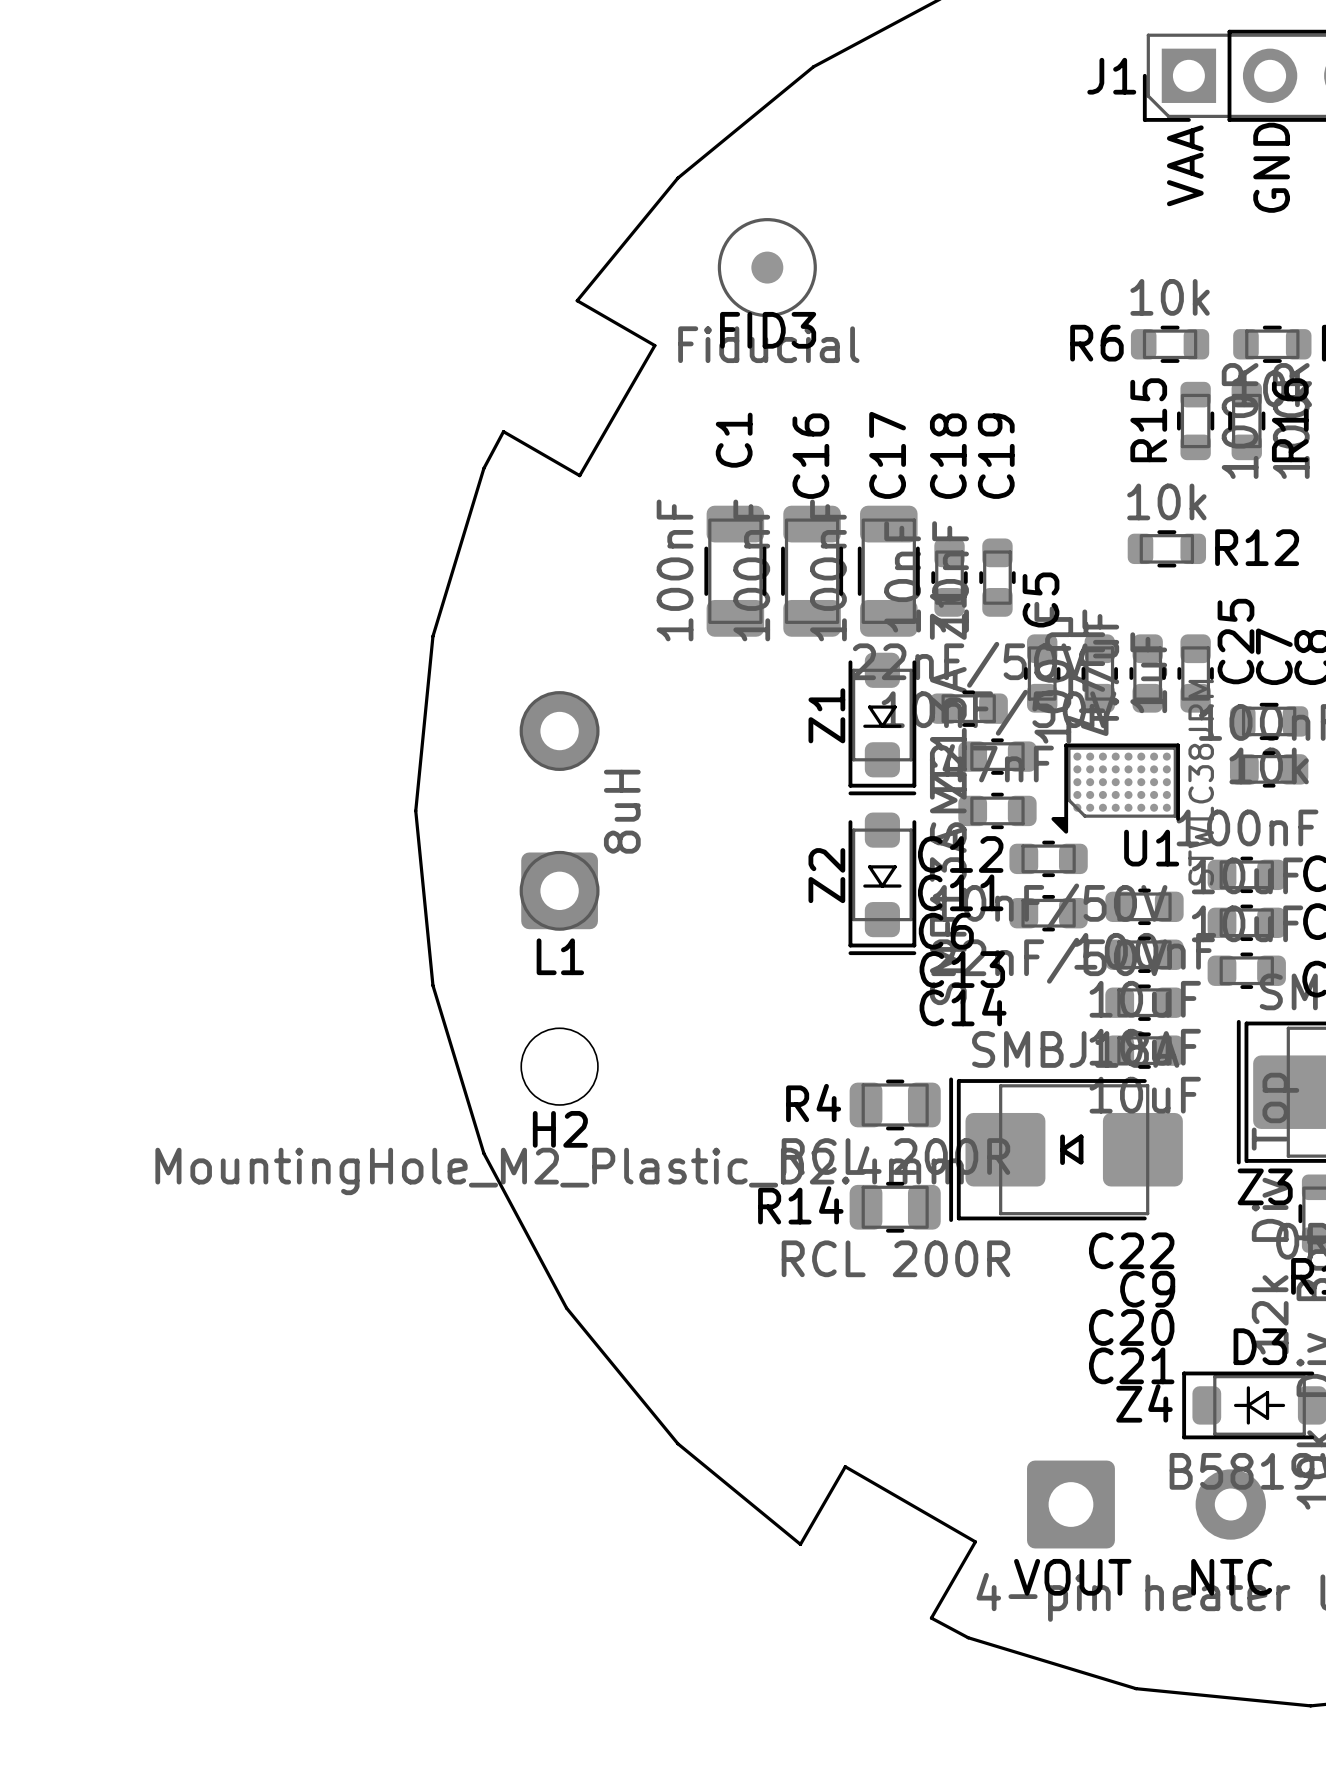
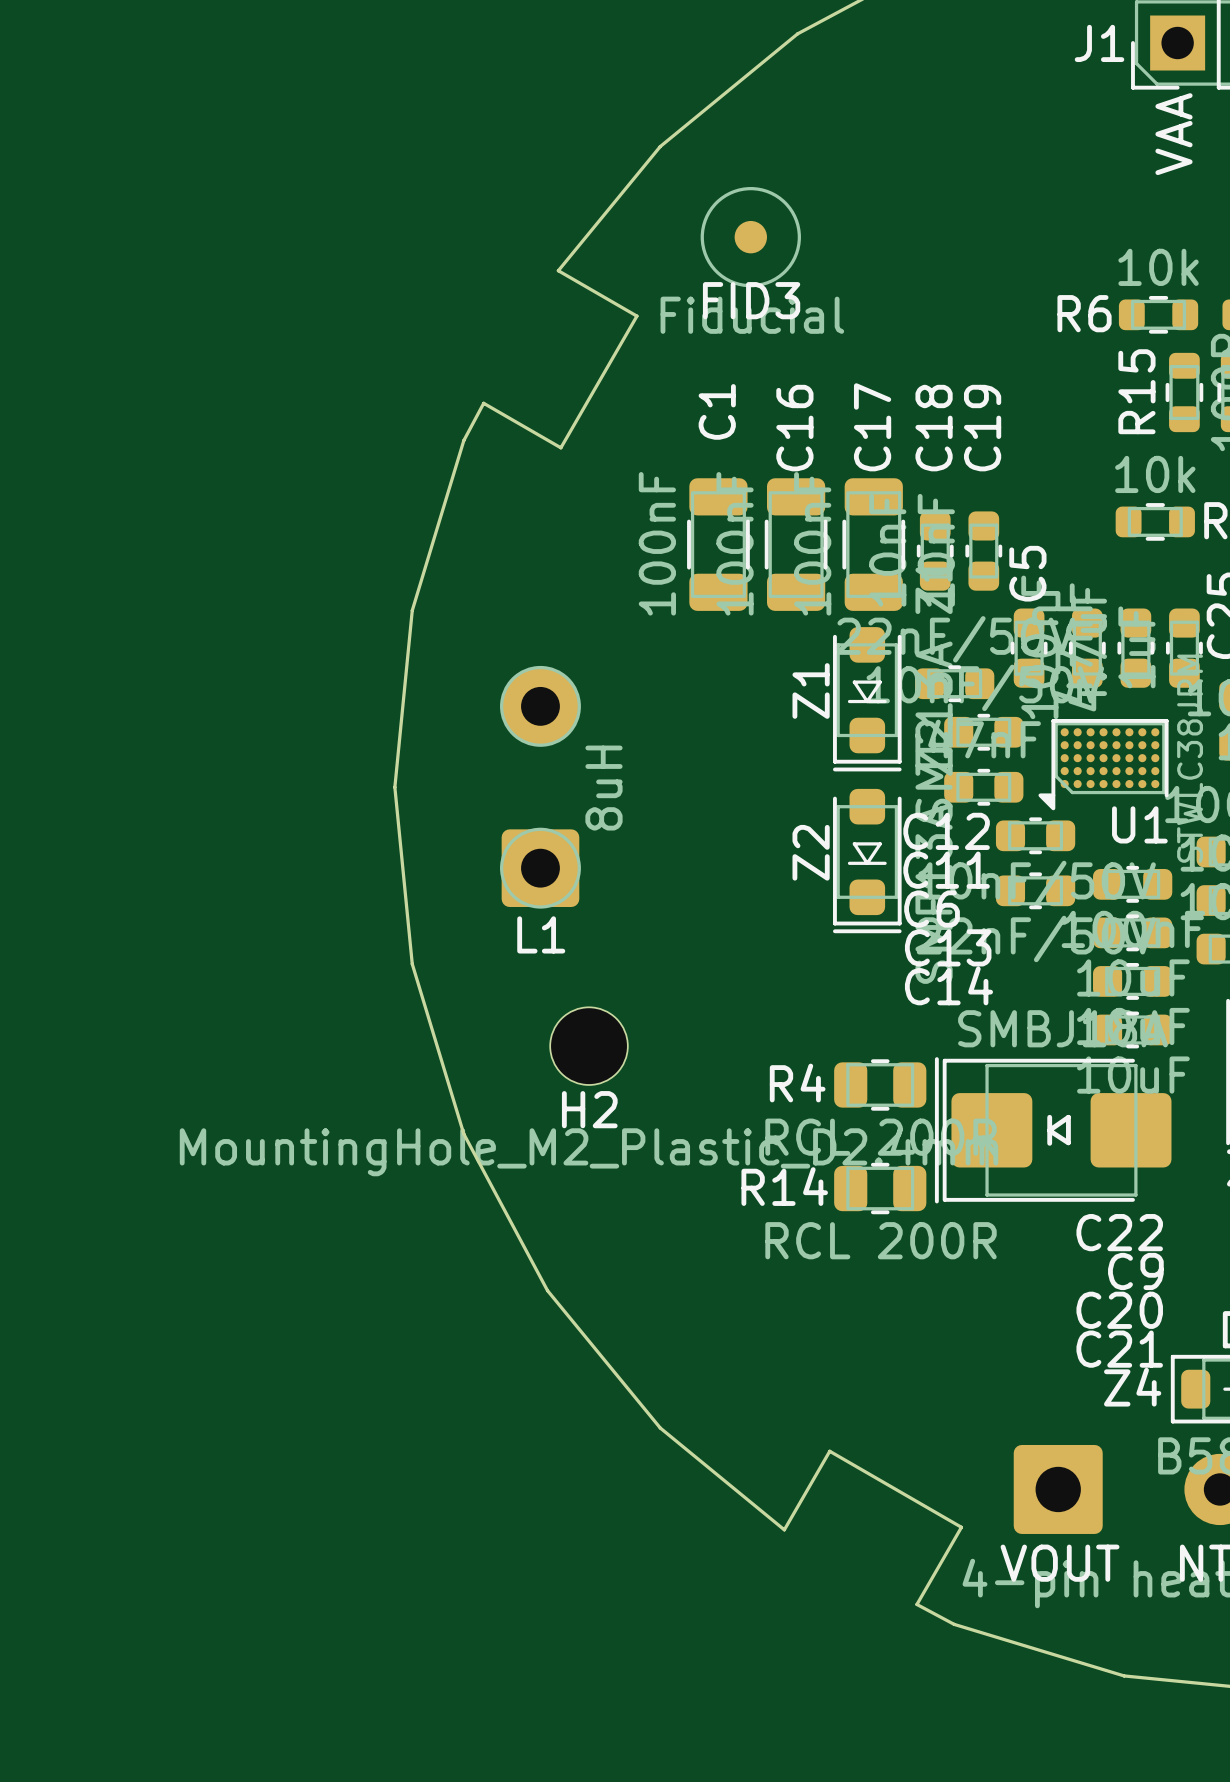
H2 position: (559, 1066) -> (589, 1046)

